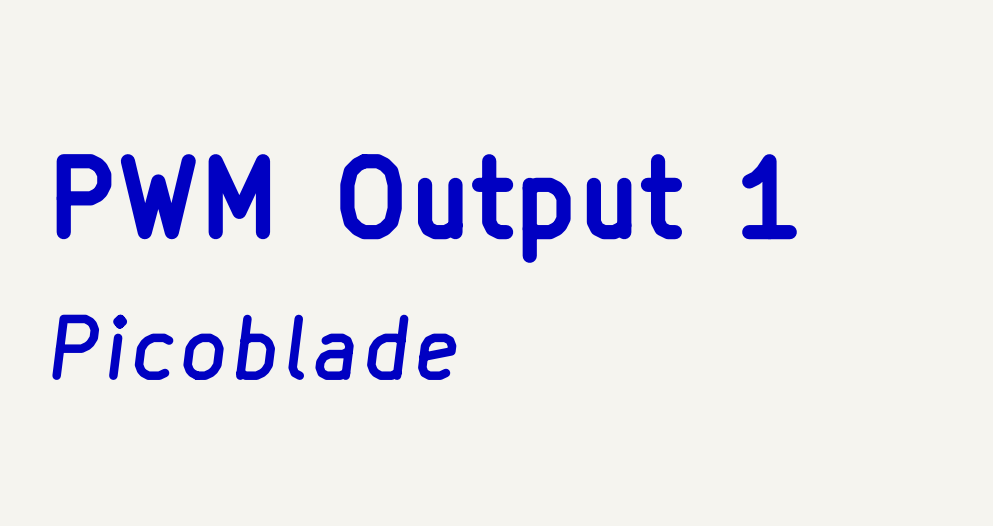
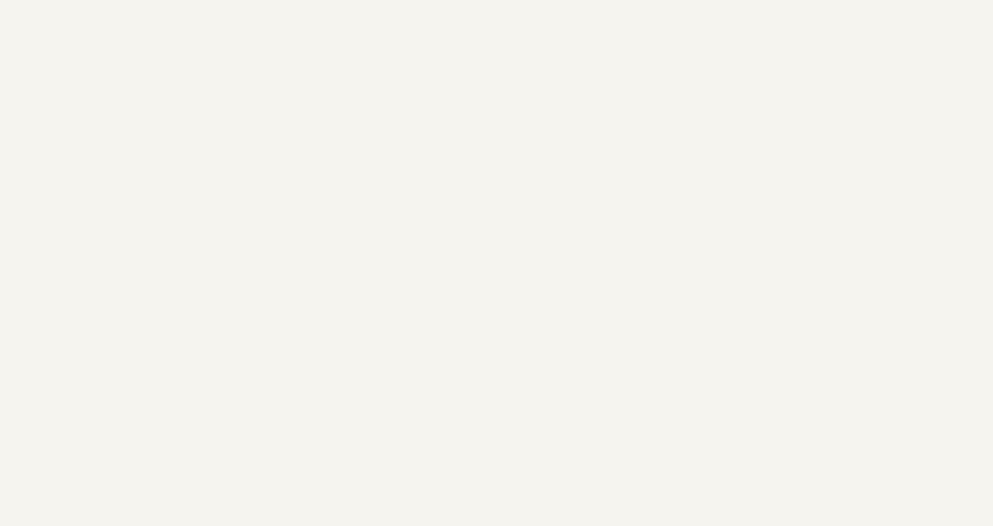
text: PWM Output 1 (426, 208) -> none
text: Picoblade (254, 347) -> none

